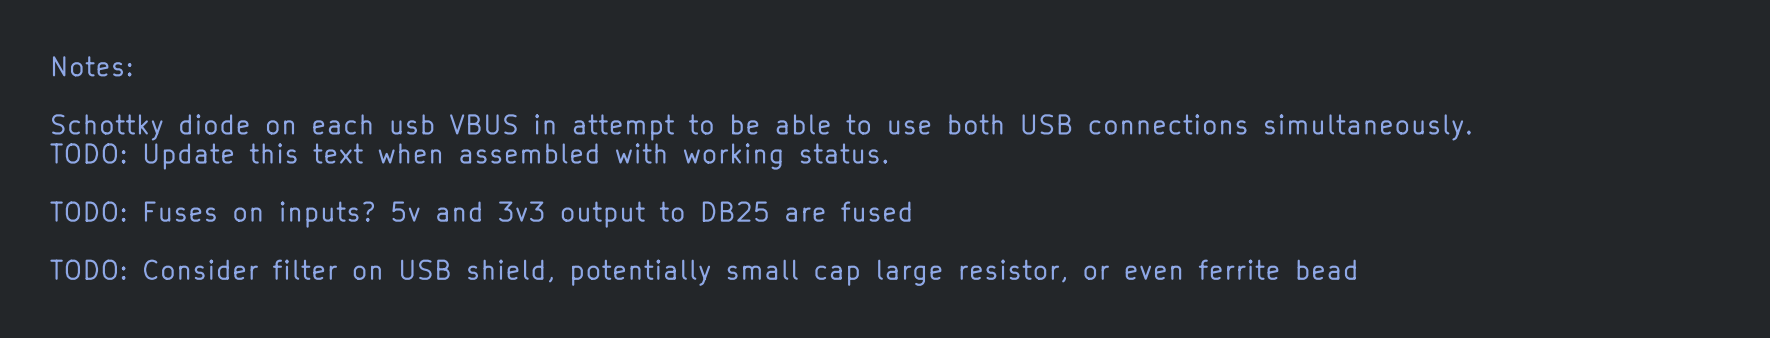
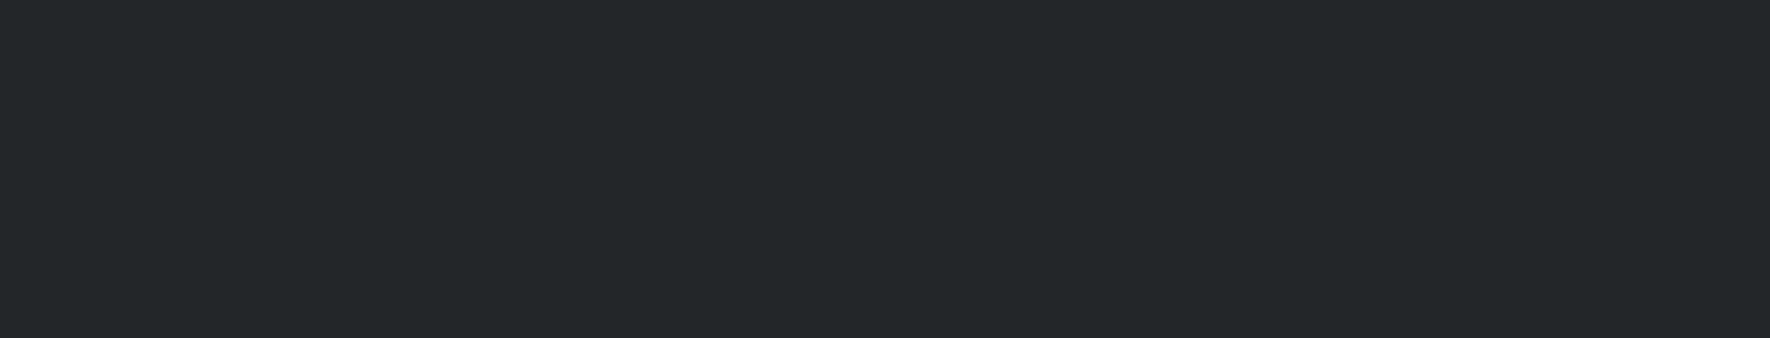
text: Notes: (92, 66) -> none
text: Schottky diode on each usb VBUS in attempt to be able to use both USB connections simultaneously. (761, 127) -> none
text: TODO: Update this text when assembled with working status. (468, 156) -> none
text: TODO: Fuses on inputs? 5v and 3v3 output to DB25 are fused (480, 214) -> none
text: TODO: Consider filter on USB shield, potentially small cap large resistor, or even ferrite bead (703, 272) -> none

